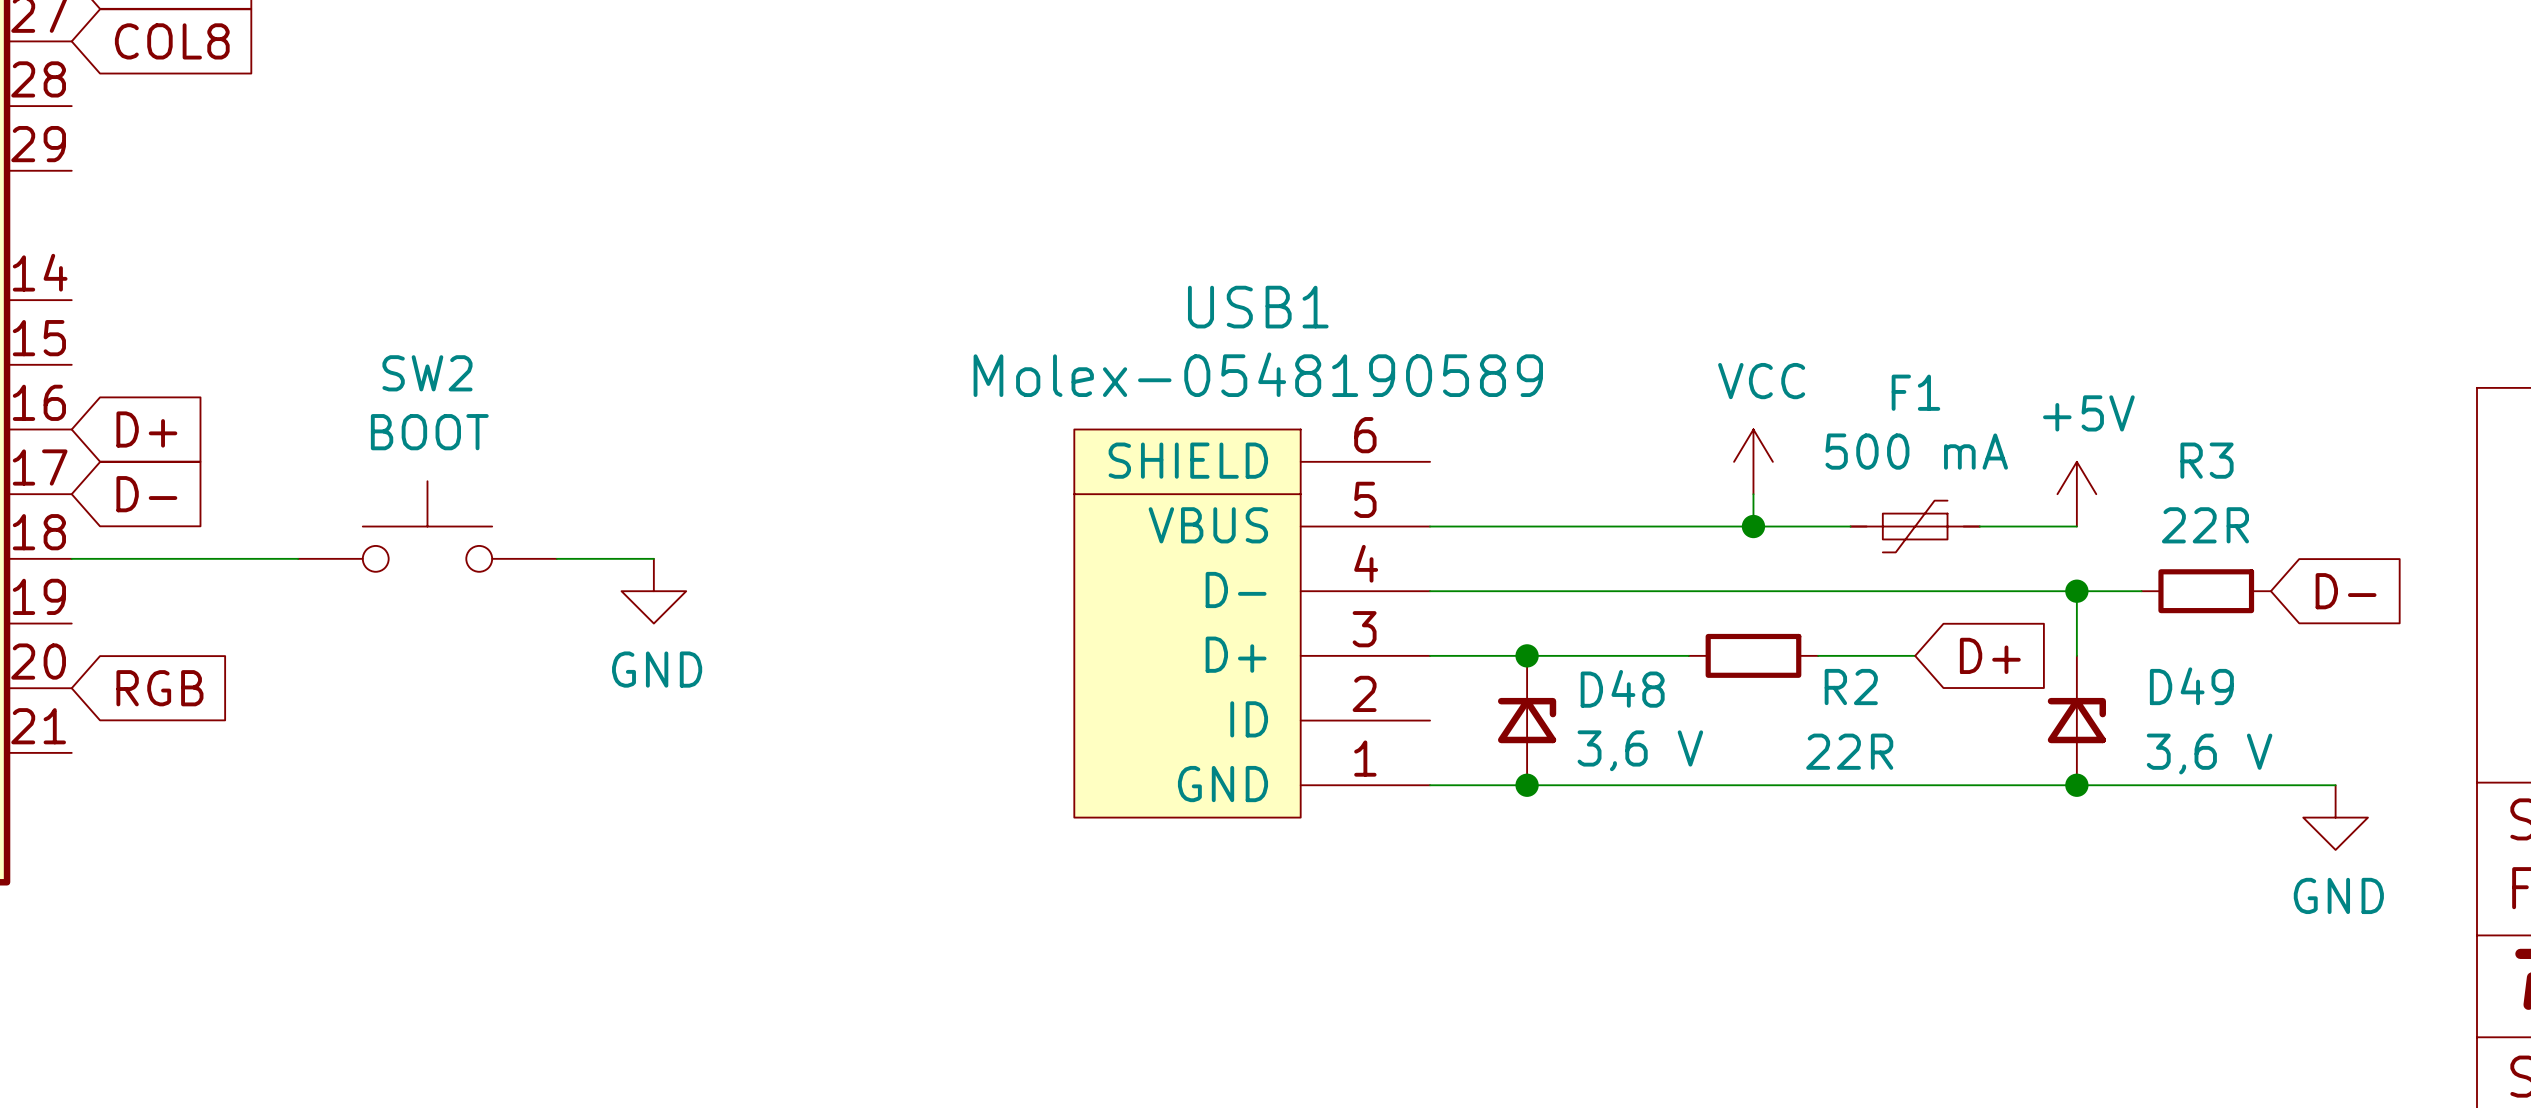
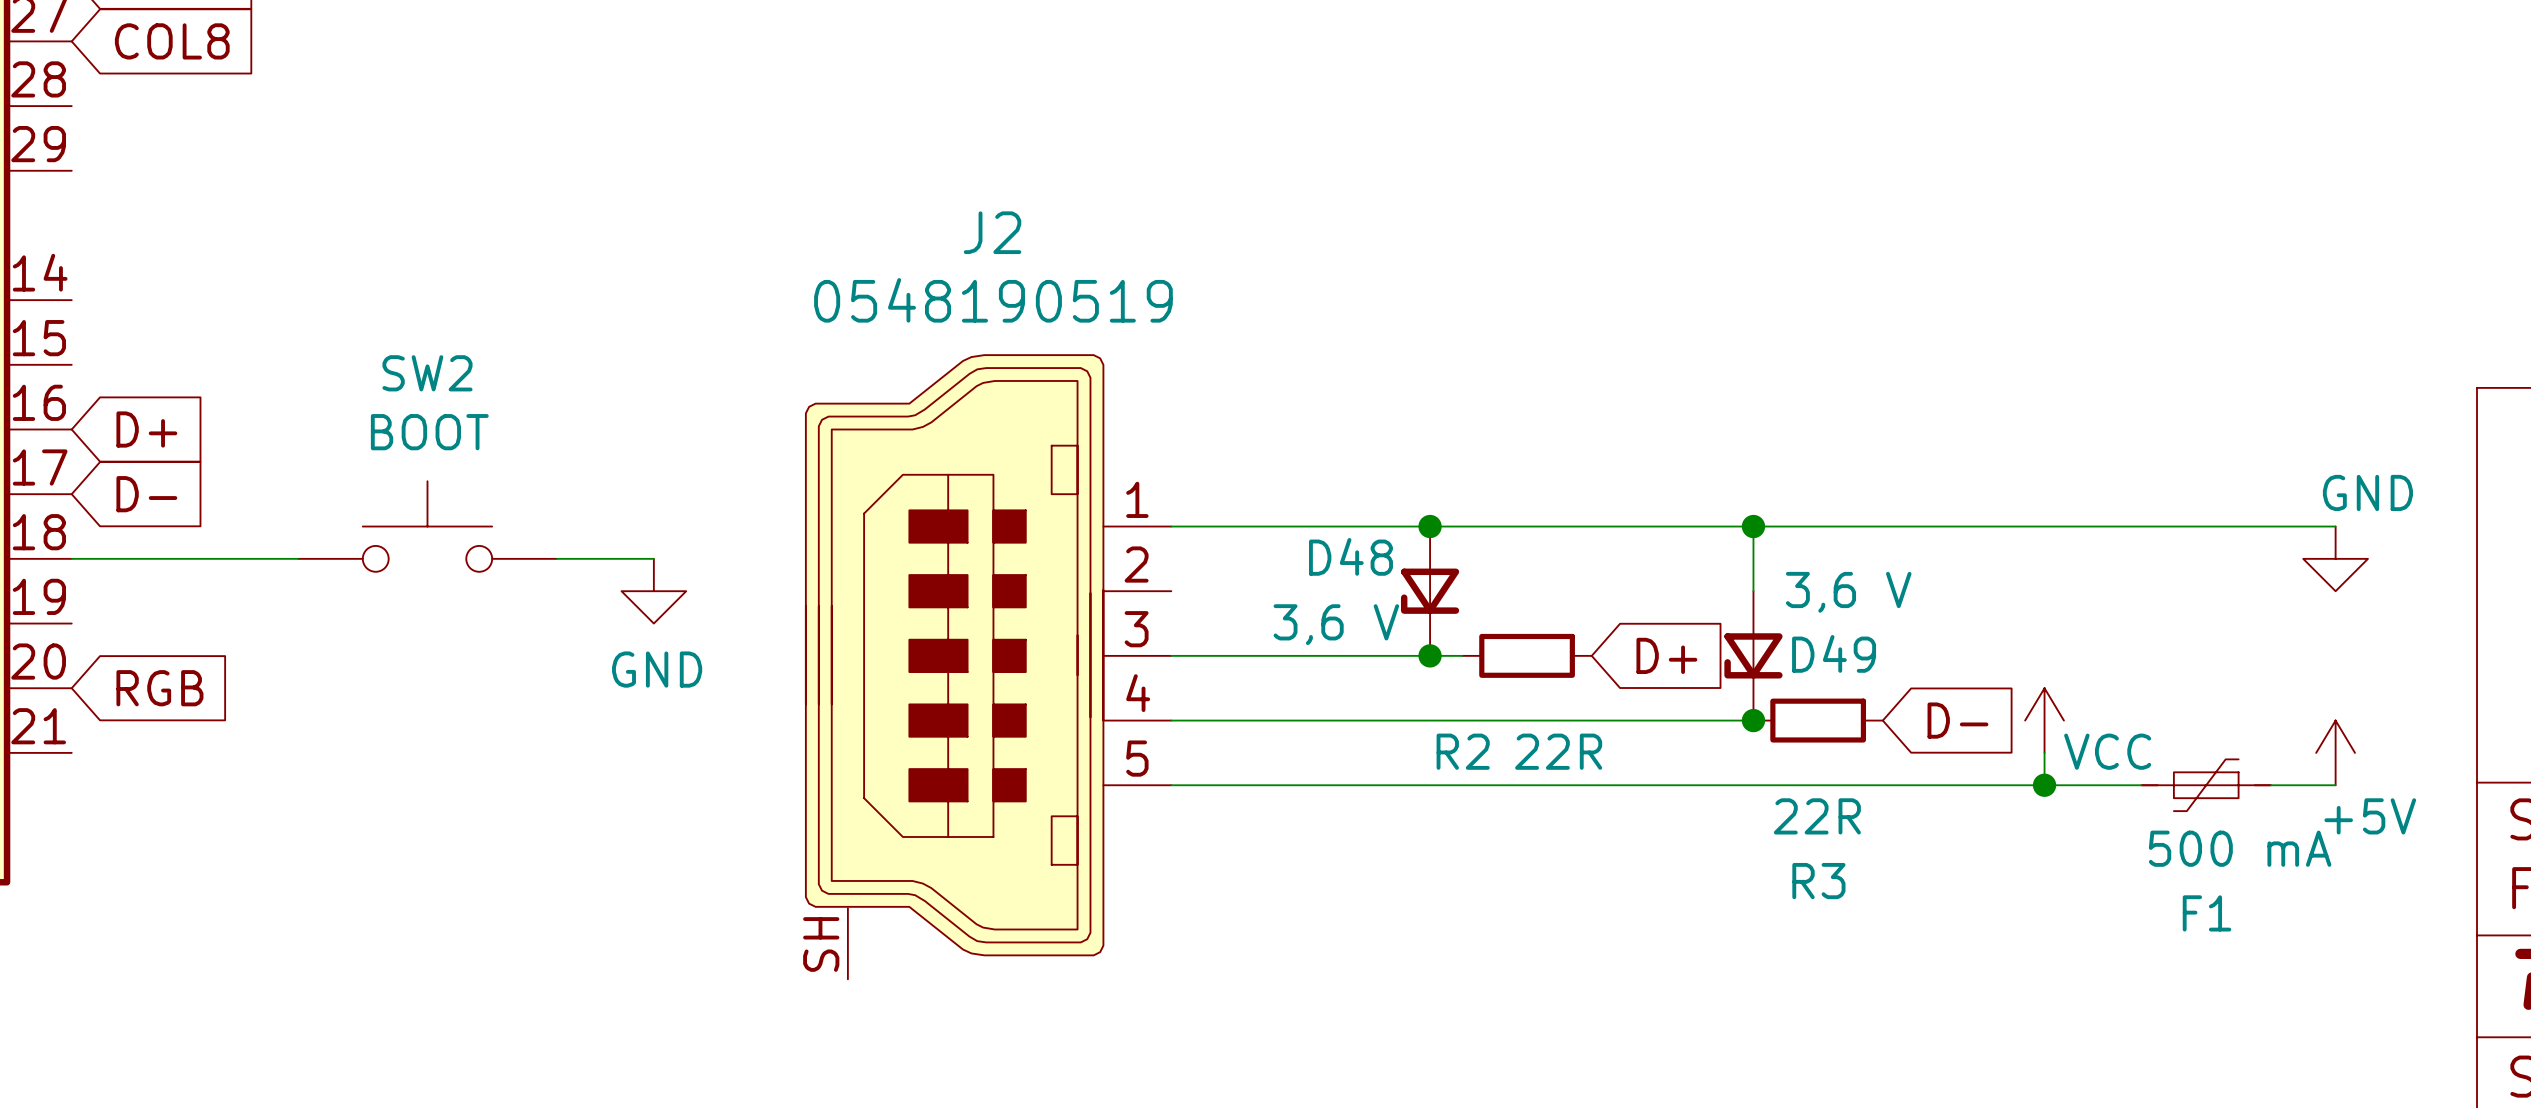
power symbol text position: VCC (1761, 381) -> VCC (2107, 751)
F1 name position: F1 (1915, 392) -> F1 (2207, 913)
power symbol text position: +5V (2088, 413) -> +5V (2370, 816)
F1 value position: 500 mA (1916, 451) -> 500 mA (2240, 848)
R3 name position: R3 (2207, 460) -> R3 (1818, 881)
power symbol position: VCC (1753, 461) -> VCC (2044, 720)
wire: (1753, 494) (1753, 526) -> (1753, 591) (1753, 526)
power symbol position: +5V (2076, 494) -> +5V (2335, 752)
R3 value position: 22R (2205, 525) -> 22R (1817, 816)
junction: none -> (1430, 526)
F1 position: (1915, 526) -> (2206, 785)
wire: none -> (2076, 526) (2335, 526)
wire: (1430, 591) (2141, 591) -> none
wire: (2076, 591) (2076, 655) -> none
junction: (2076, 591) -> none
R3 position: (2206, 591) -> (1818, 720)
global label position: D- (2346, 591) -> D- (1957, 720)
USB1: Molex-0548190589 (1252, 623) -> none
junction: none -> (1430, 655)
wire: (1462, 655) (1688, 655) -> none
junction: (1527, 655) -> none
R2 position: (1753, 655) -> (1527, 655)
wire: (1818, 655) (1915, 655) -> none
global label position: D+ (1990, 655) -> D+ (1666, 655)
J2: none -> 0548190519 (988, 667)
D49 name position: D49 (2191, 686) -> D49 (1834, 653)
R2 name position: R2 (1851, 687) -> R2 (1463, 751)
D48 name position: D48 (1622, 688) -> D48 (1350, 556)
wire: none -> (1171, 720) (1753, 720)
D48 rotation: 0° (1527, 720) -> 180° (1430, 591)
D48 position: (1527, 720) -> (1430, 591)
junction: none -> (1753, 720)
D49 rotation: 0° (2076, 720) -> 180° (1753, 655)
D49 position: (2076, 720) -> (1753, 655)
D48 value position: 3,6 V (1640, 750) -> 3,6 V (1336, 624)
R2 value position: 22R (1849, 751) -> 22R (1558, 751)
wire: none -> (2044, 752) (2044, 785)
D49 value position: 3,6 V (2209, 754) -> 3,6 V (1848, 592)
junction: (1527, 785) -> none
junction position: (2076, 785) -> (2044, 785)
power symbol position: GND (2335, 817) -> GND (2335, 558)
power symbol text position: GND (2338, 895) -> GND (2367, 492)

